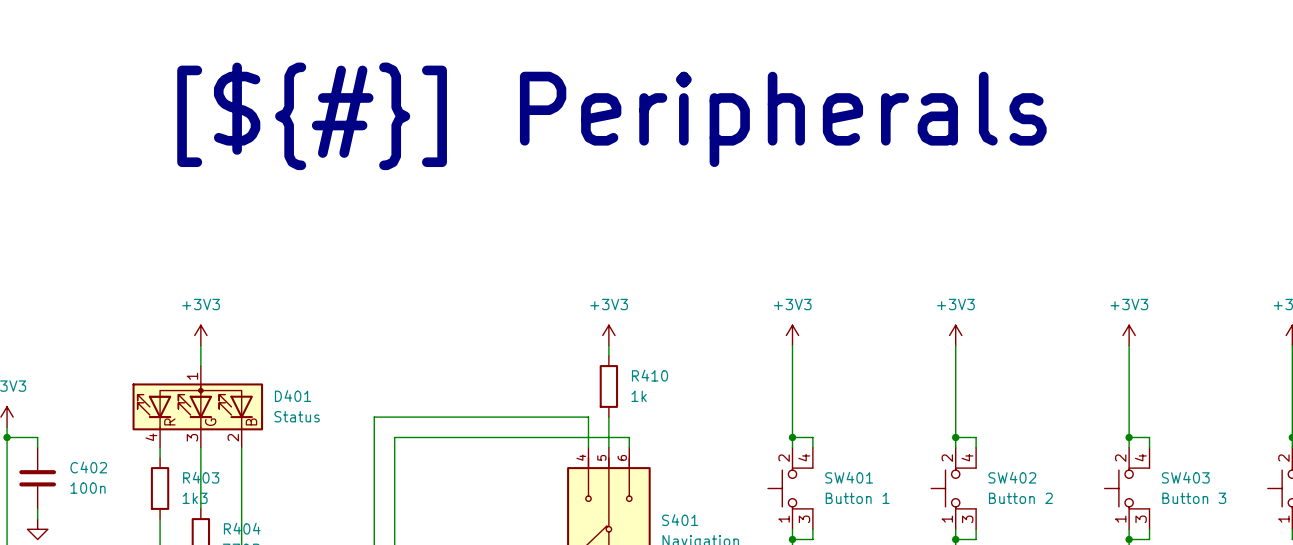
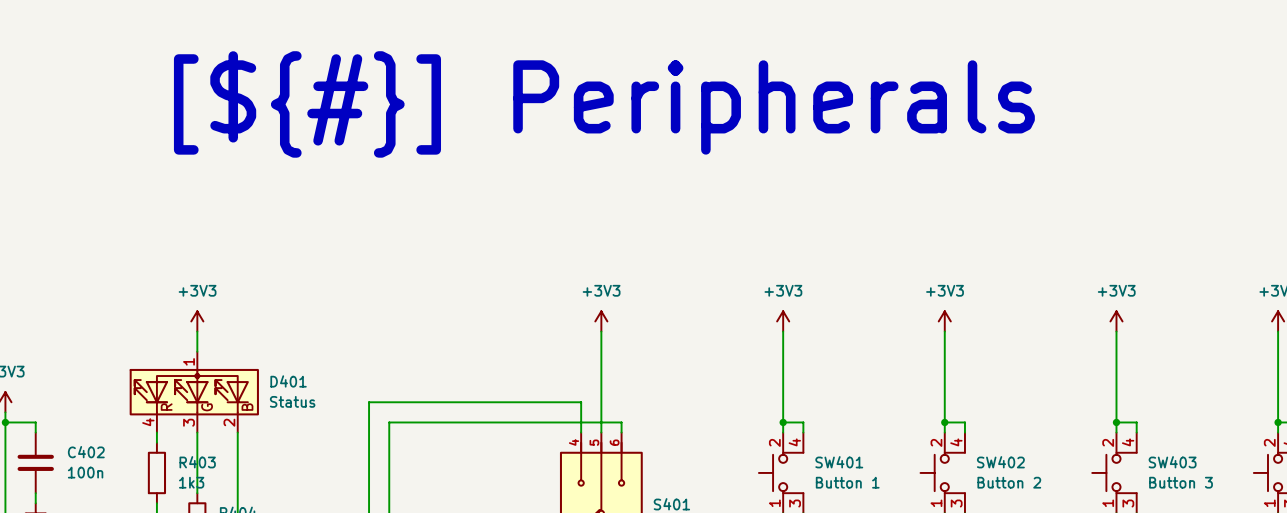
wire: none -> (601, 341) (601, 402)
R410: 1k (608, 386) -> none

